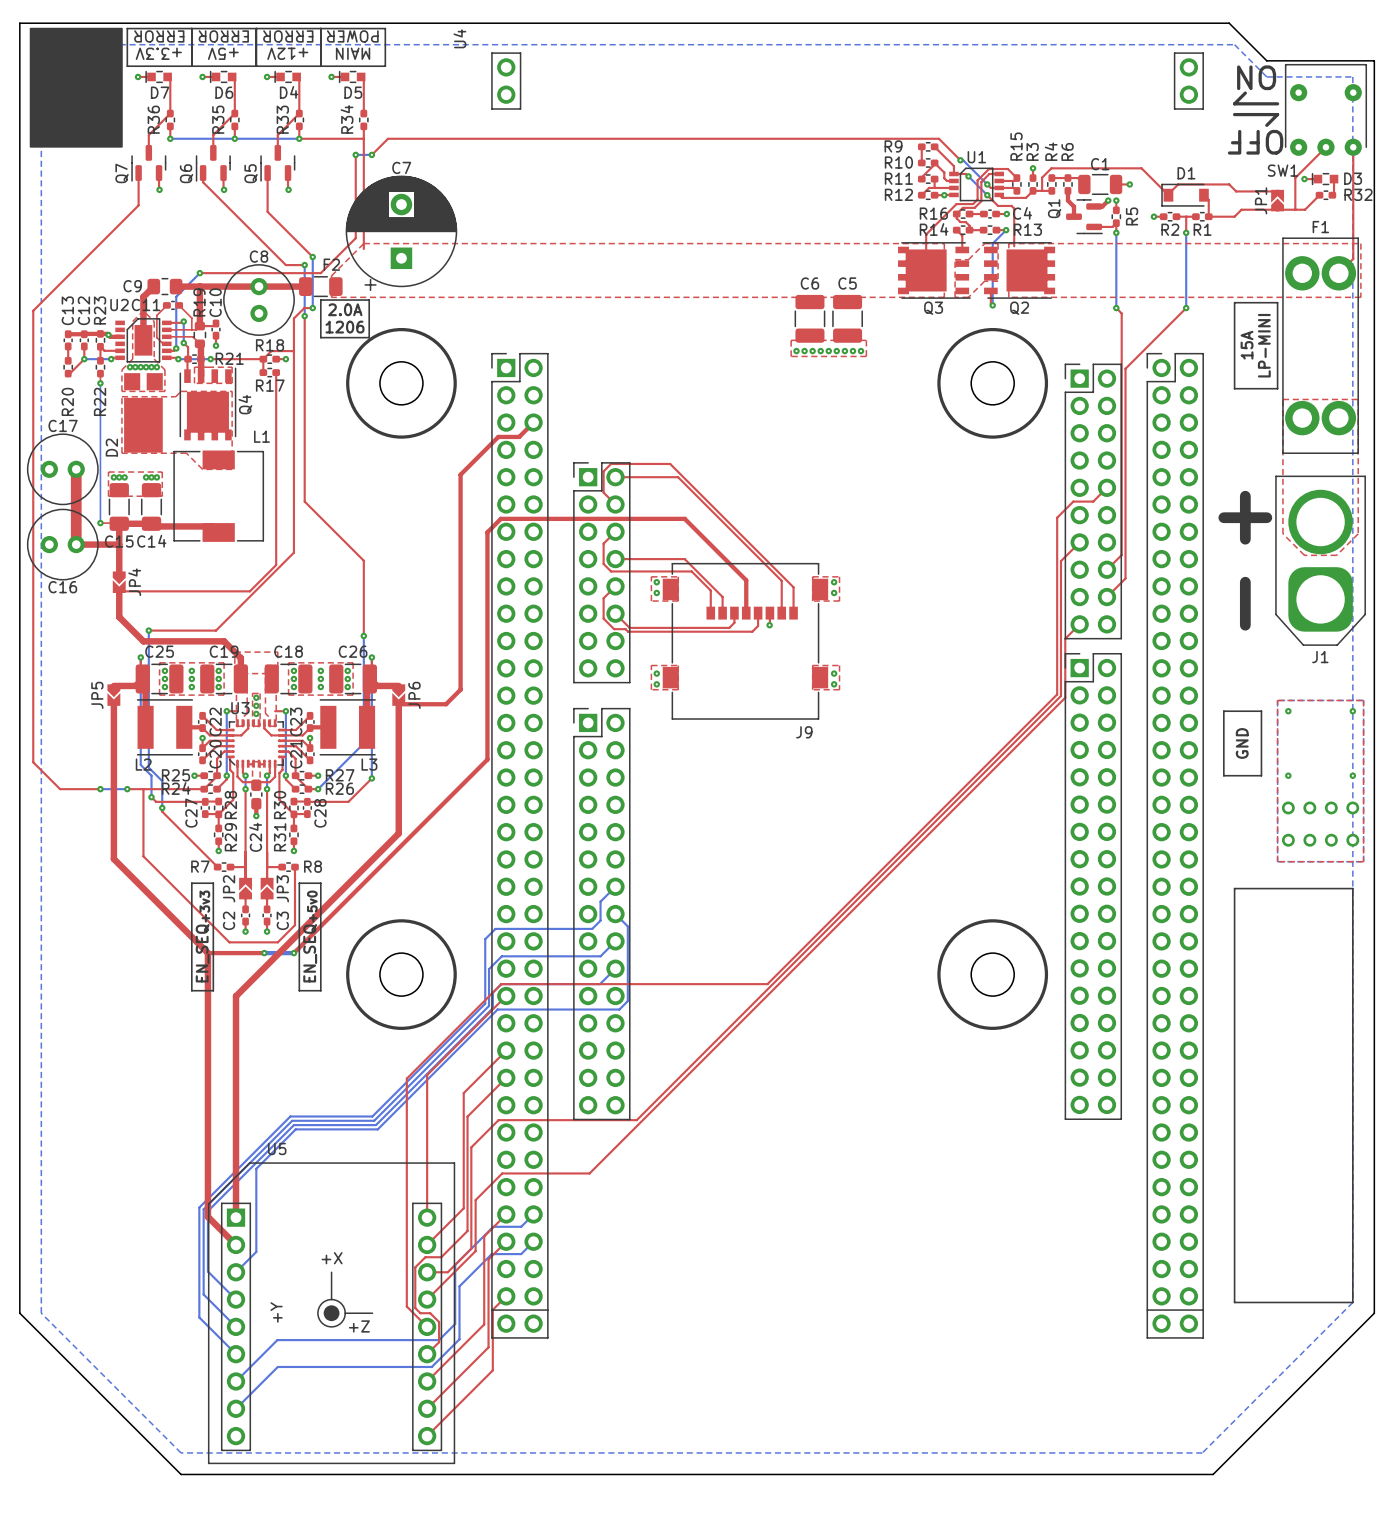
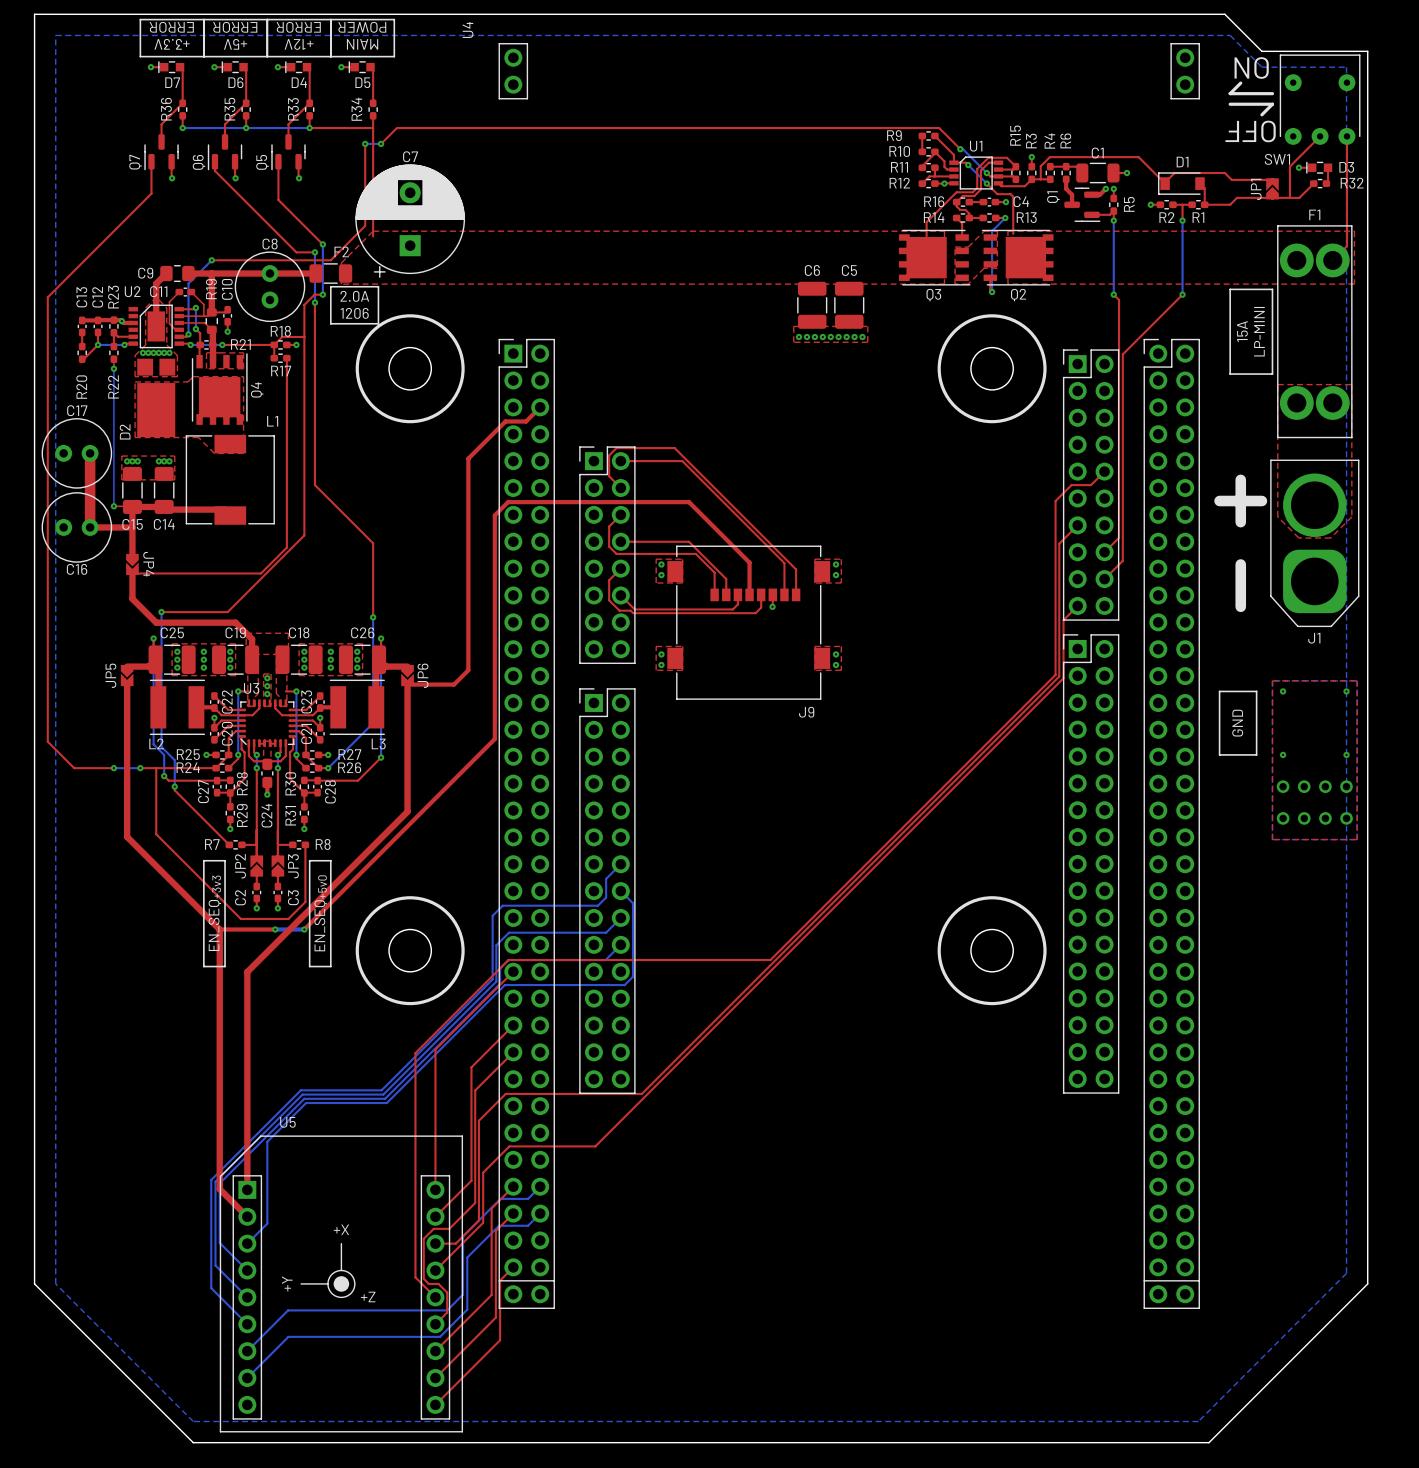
drawing: [29, 27, 123, 148] -> none
JP4 name rotation: 0° (134, 582) -> 180° (148, 564)
line: (1234, 888) (1234, 1302) (1352, 1302) (1352, 888) (1234, 888) -> none
U5 footprint: [208, 1162, 456, 1465] -> [219, 1135, 463, 1433]

